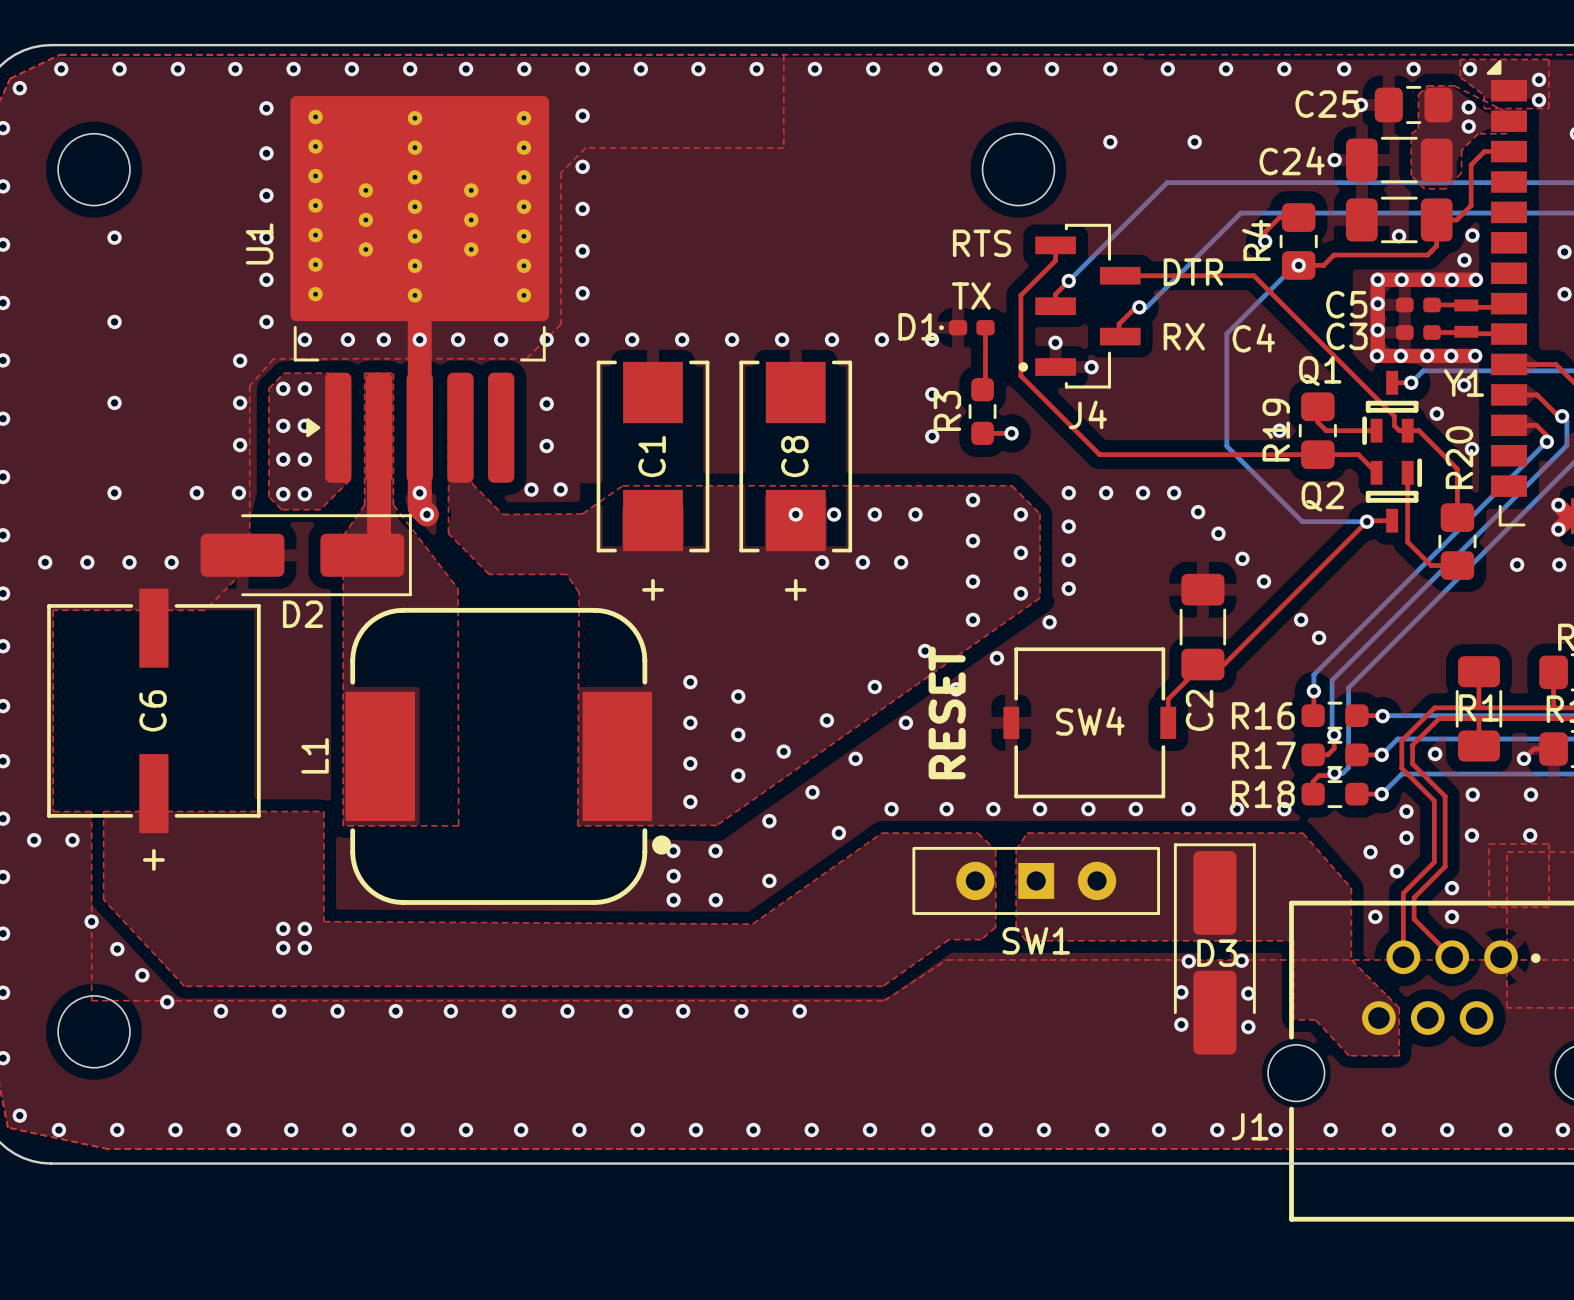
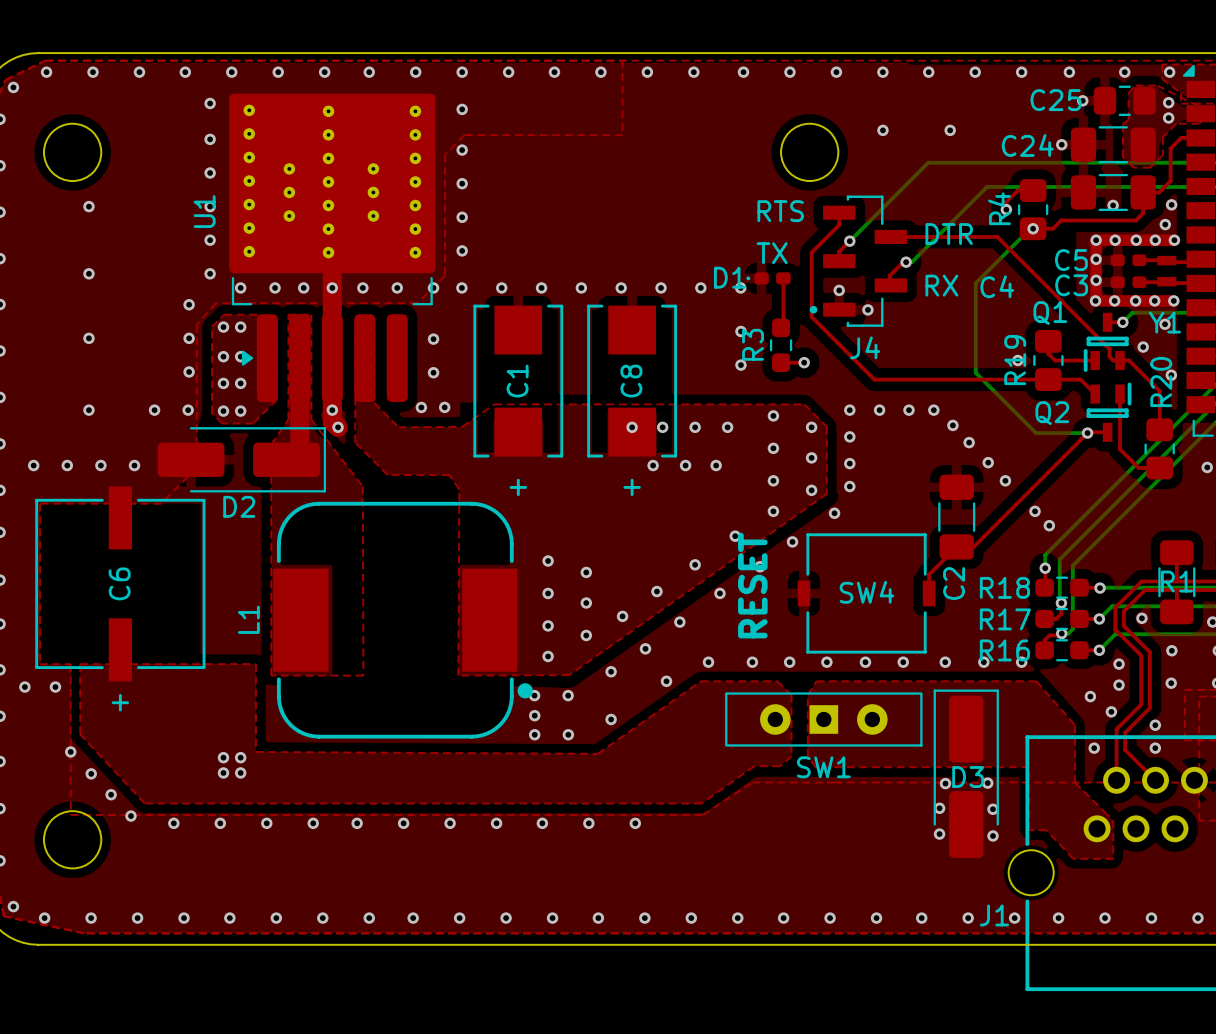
R16 name: R16 (1263, 715) -> R18 (1004, 587)
R18 name: R18 (1263, 794) -> R16 (1004, 650)

